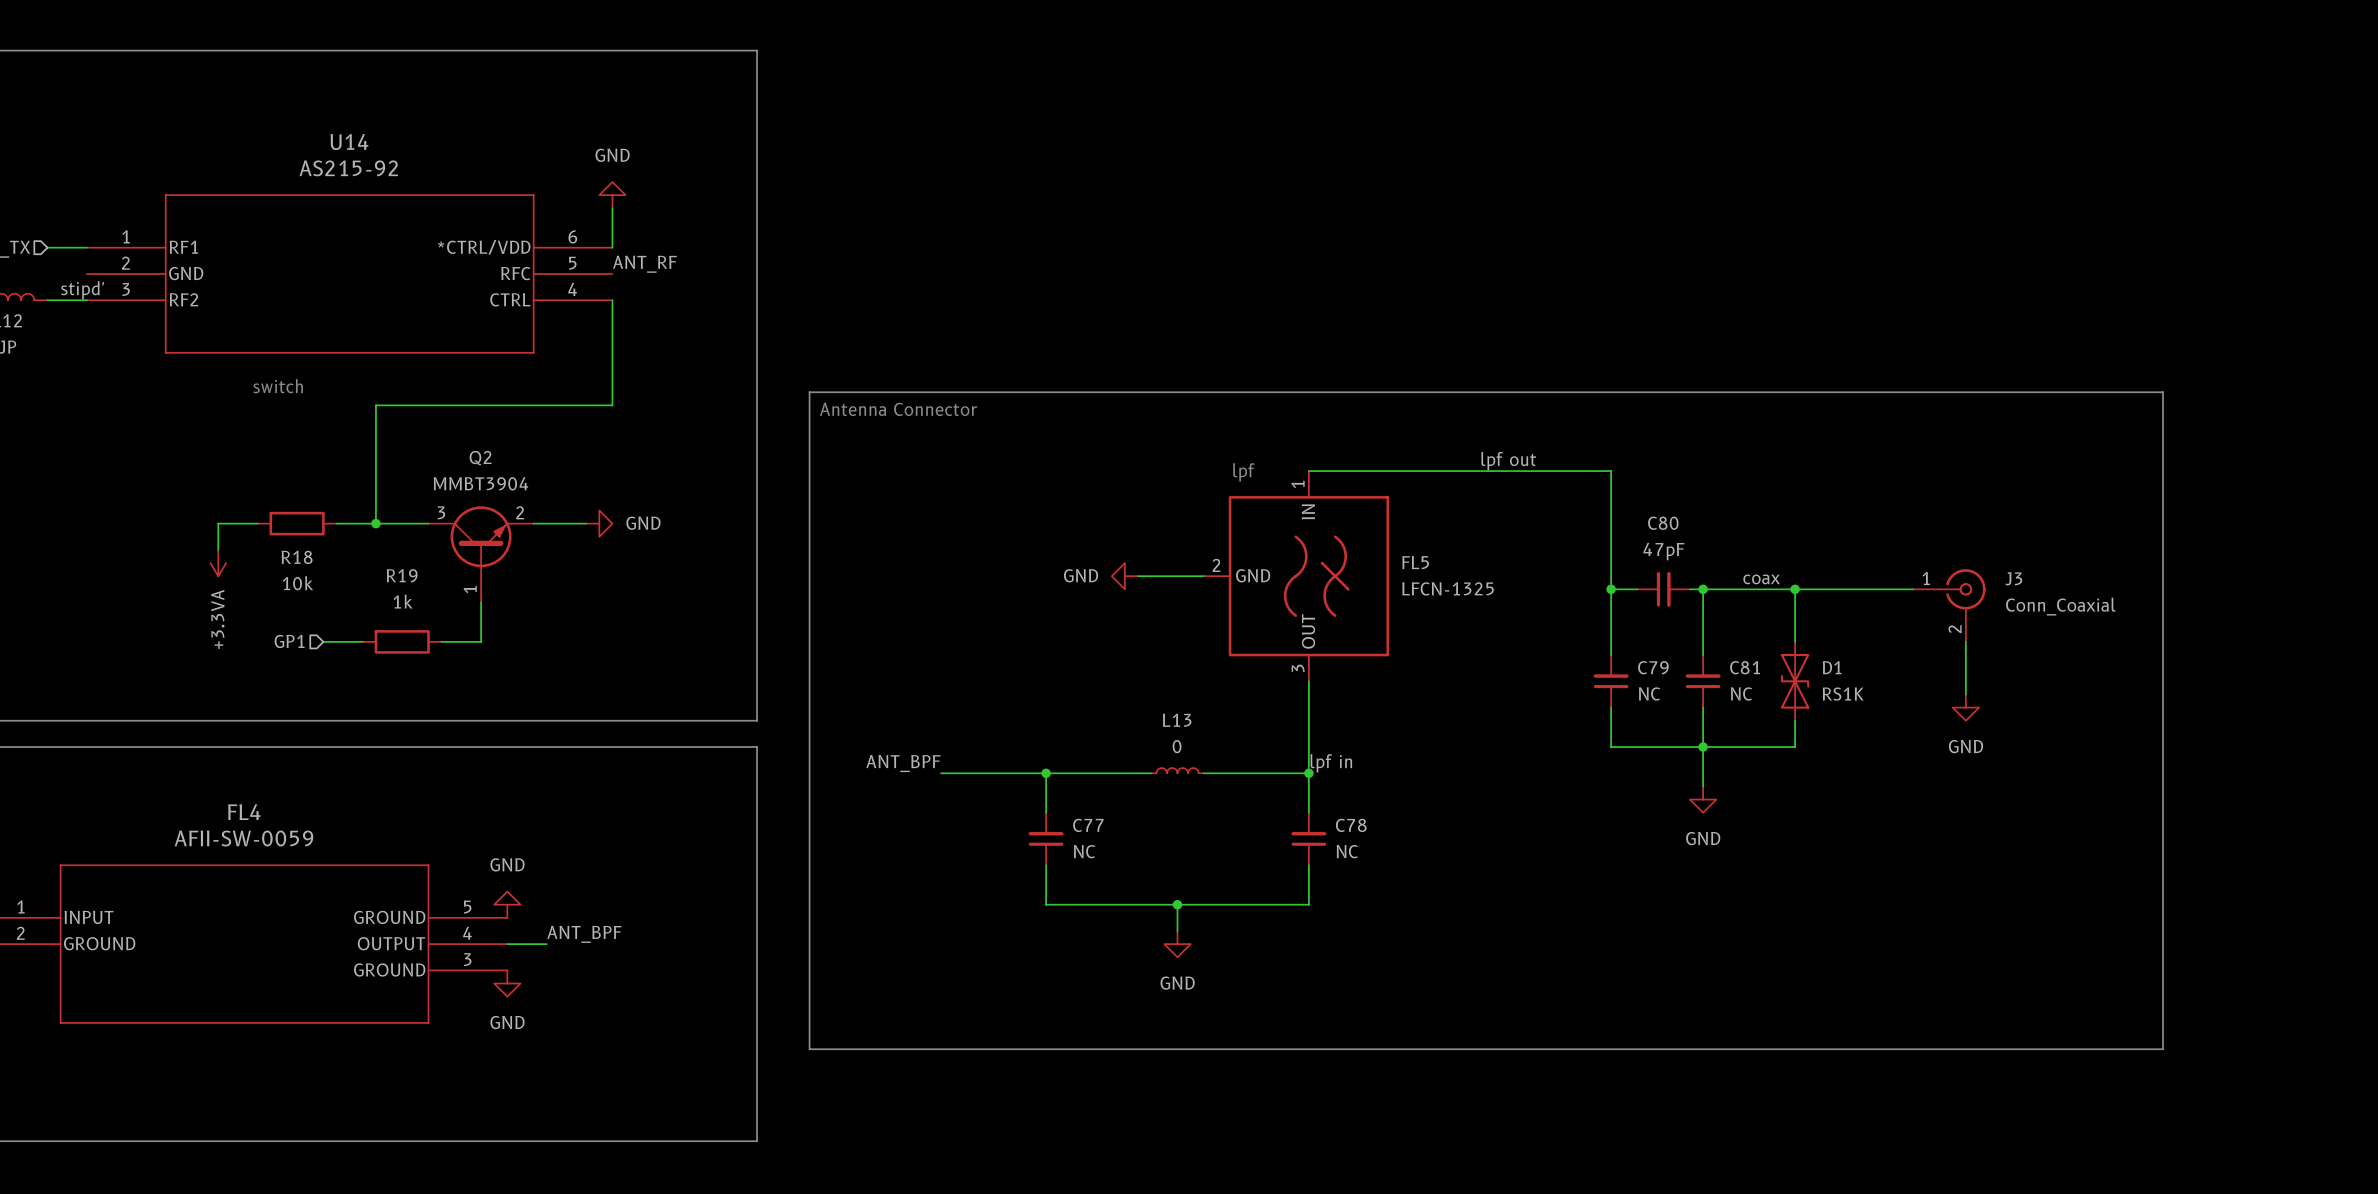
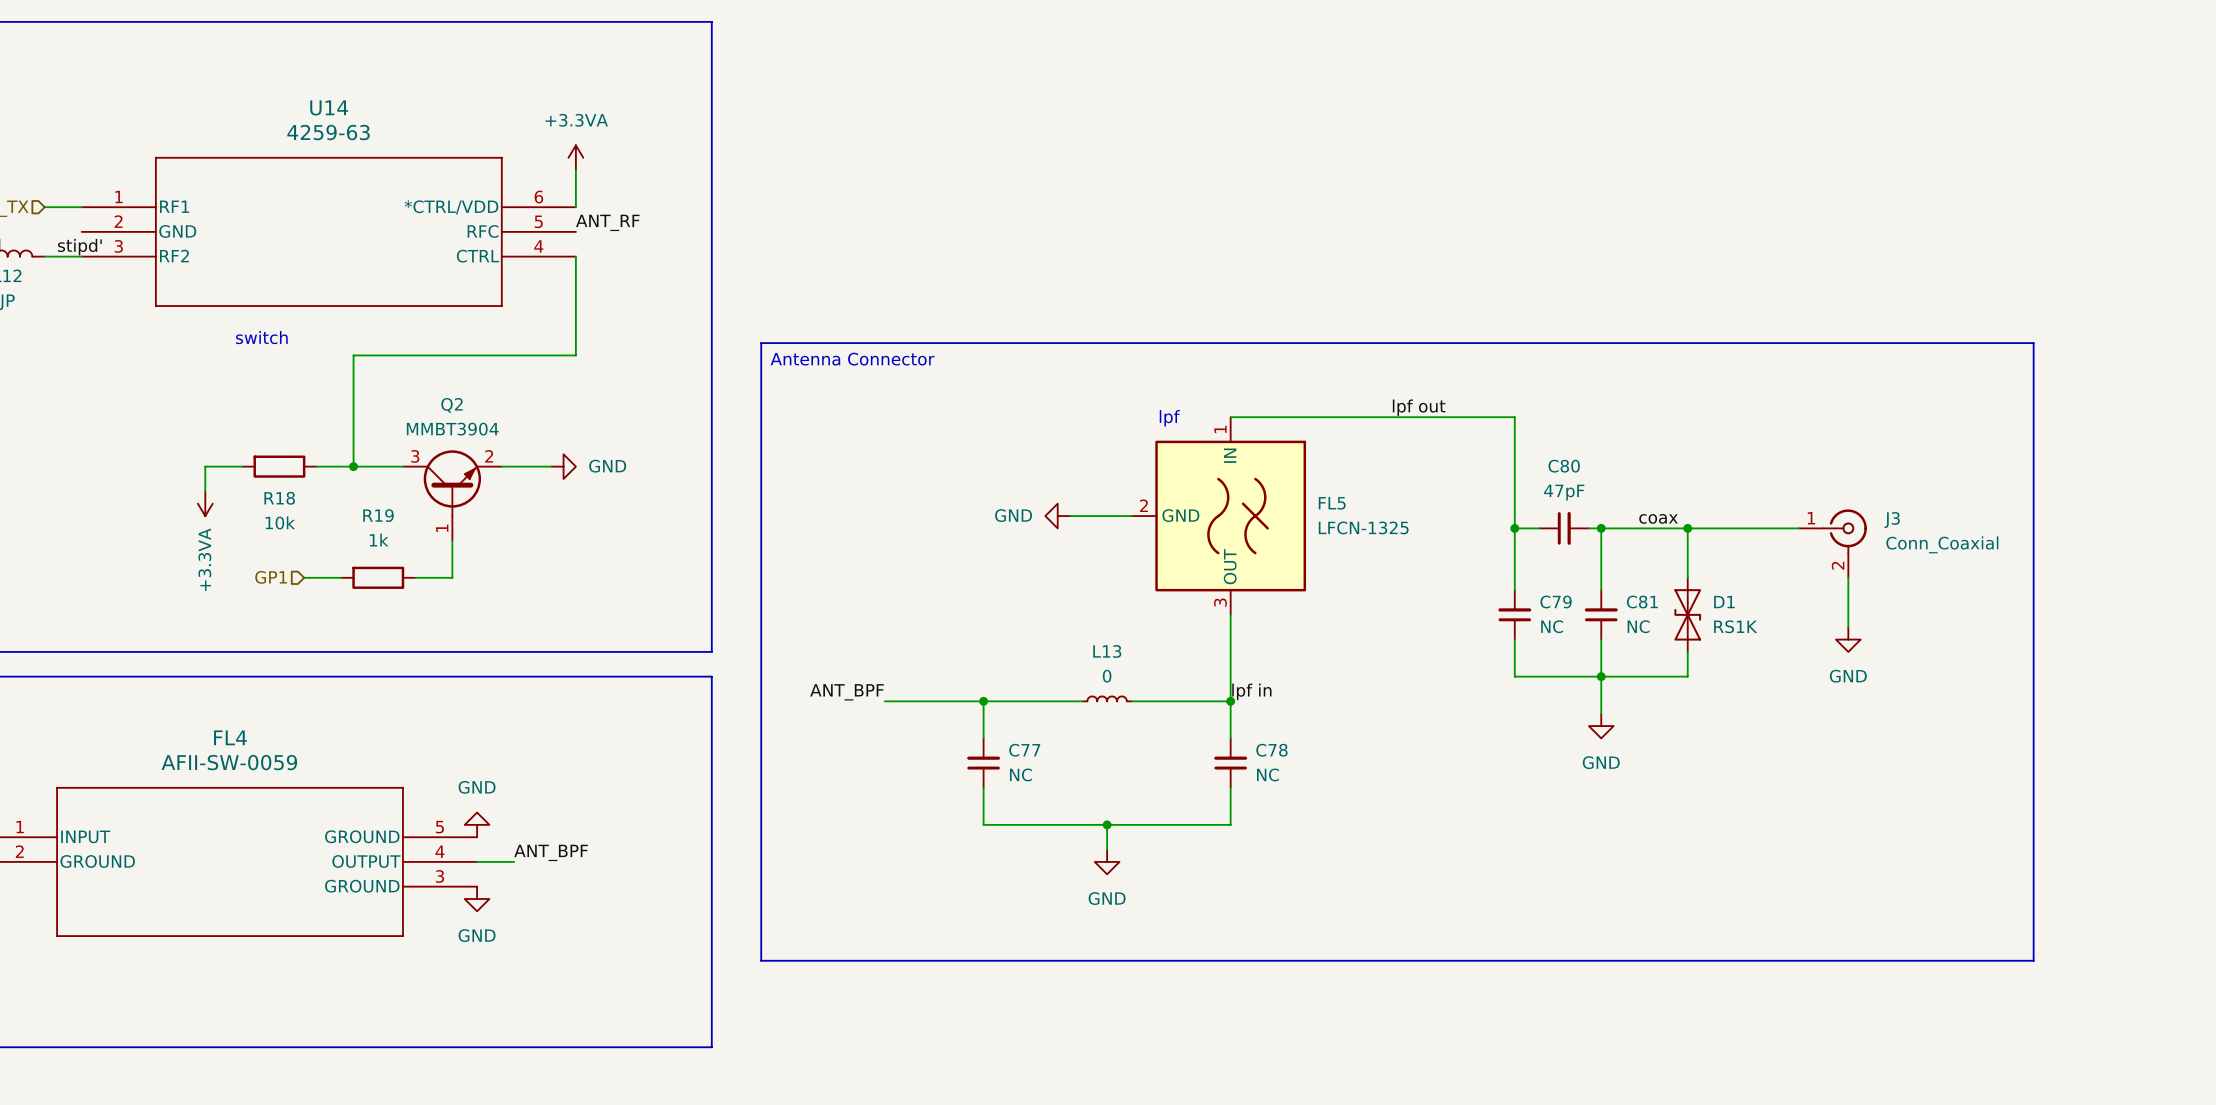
U14 value: AS215-92 (348, 168) -> 4259-63 (328, 132)
power symbol: GND (612, 195) -> +3.3VA (575, 157)

